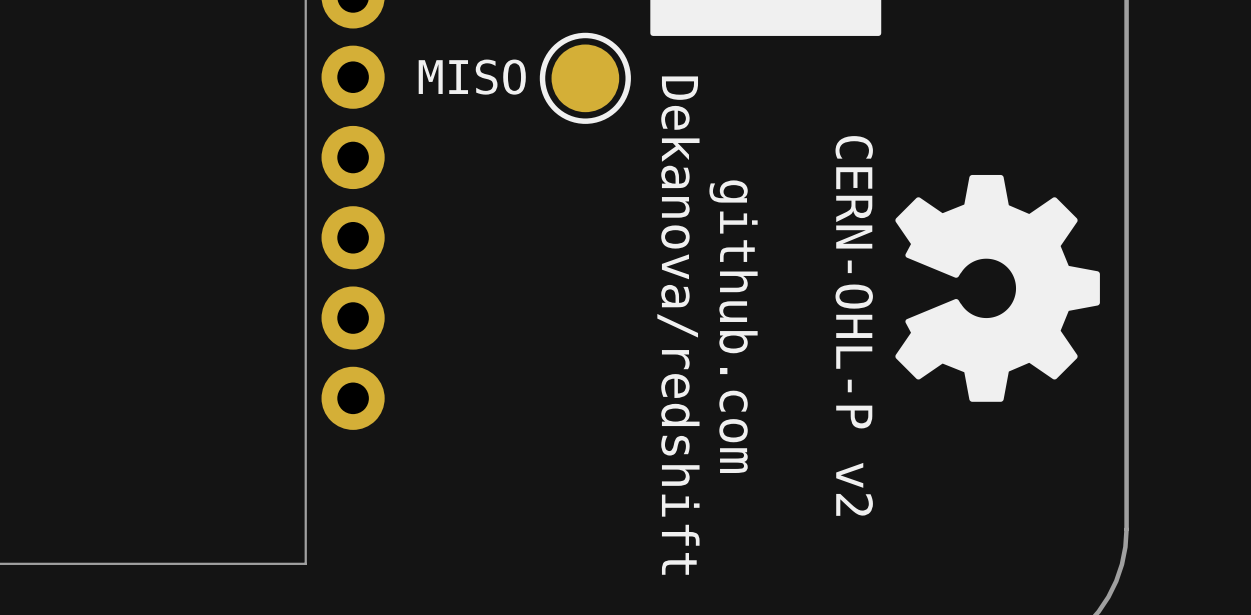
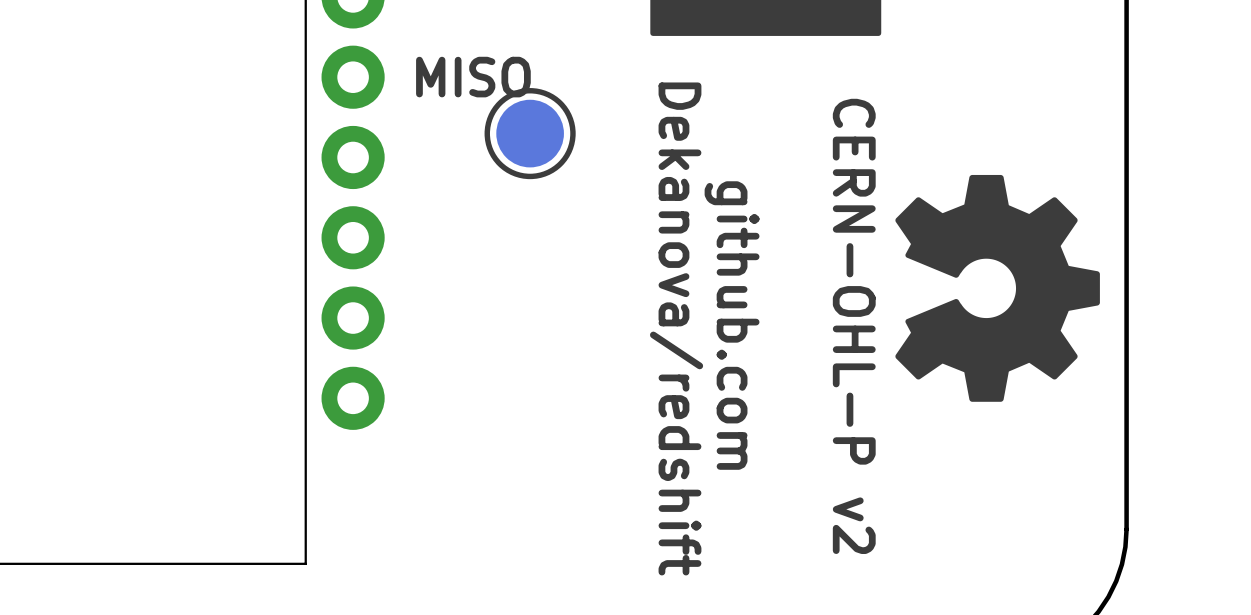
part position: (585, 78) -> (530, 133)

